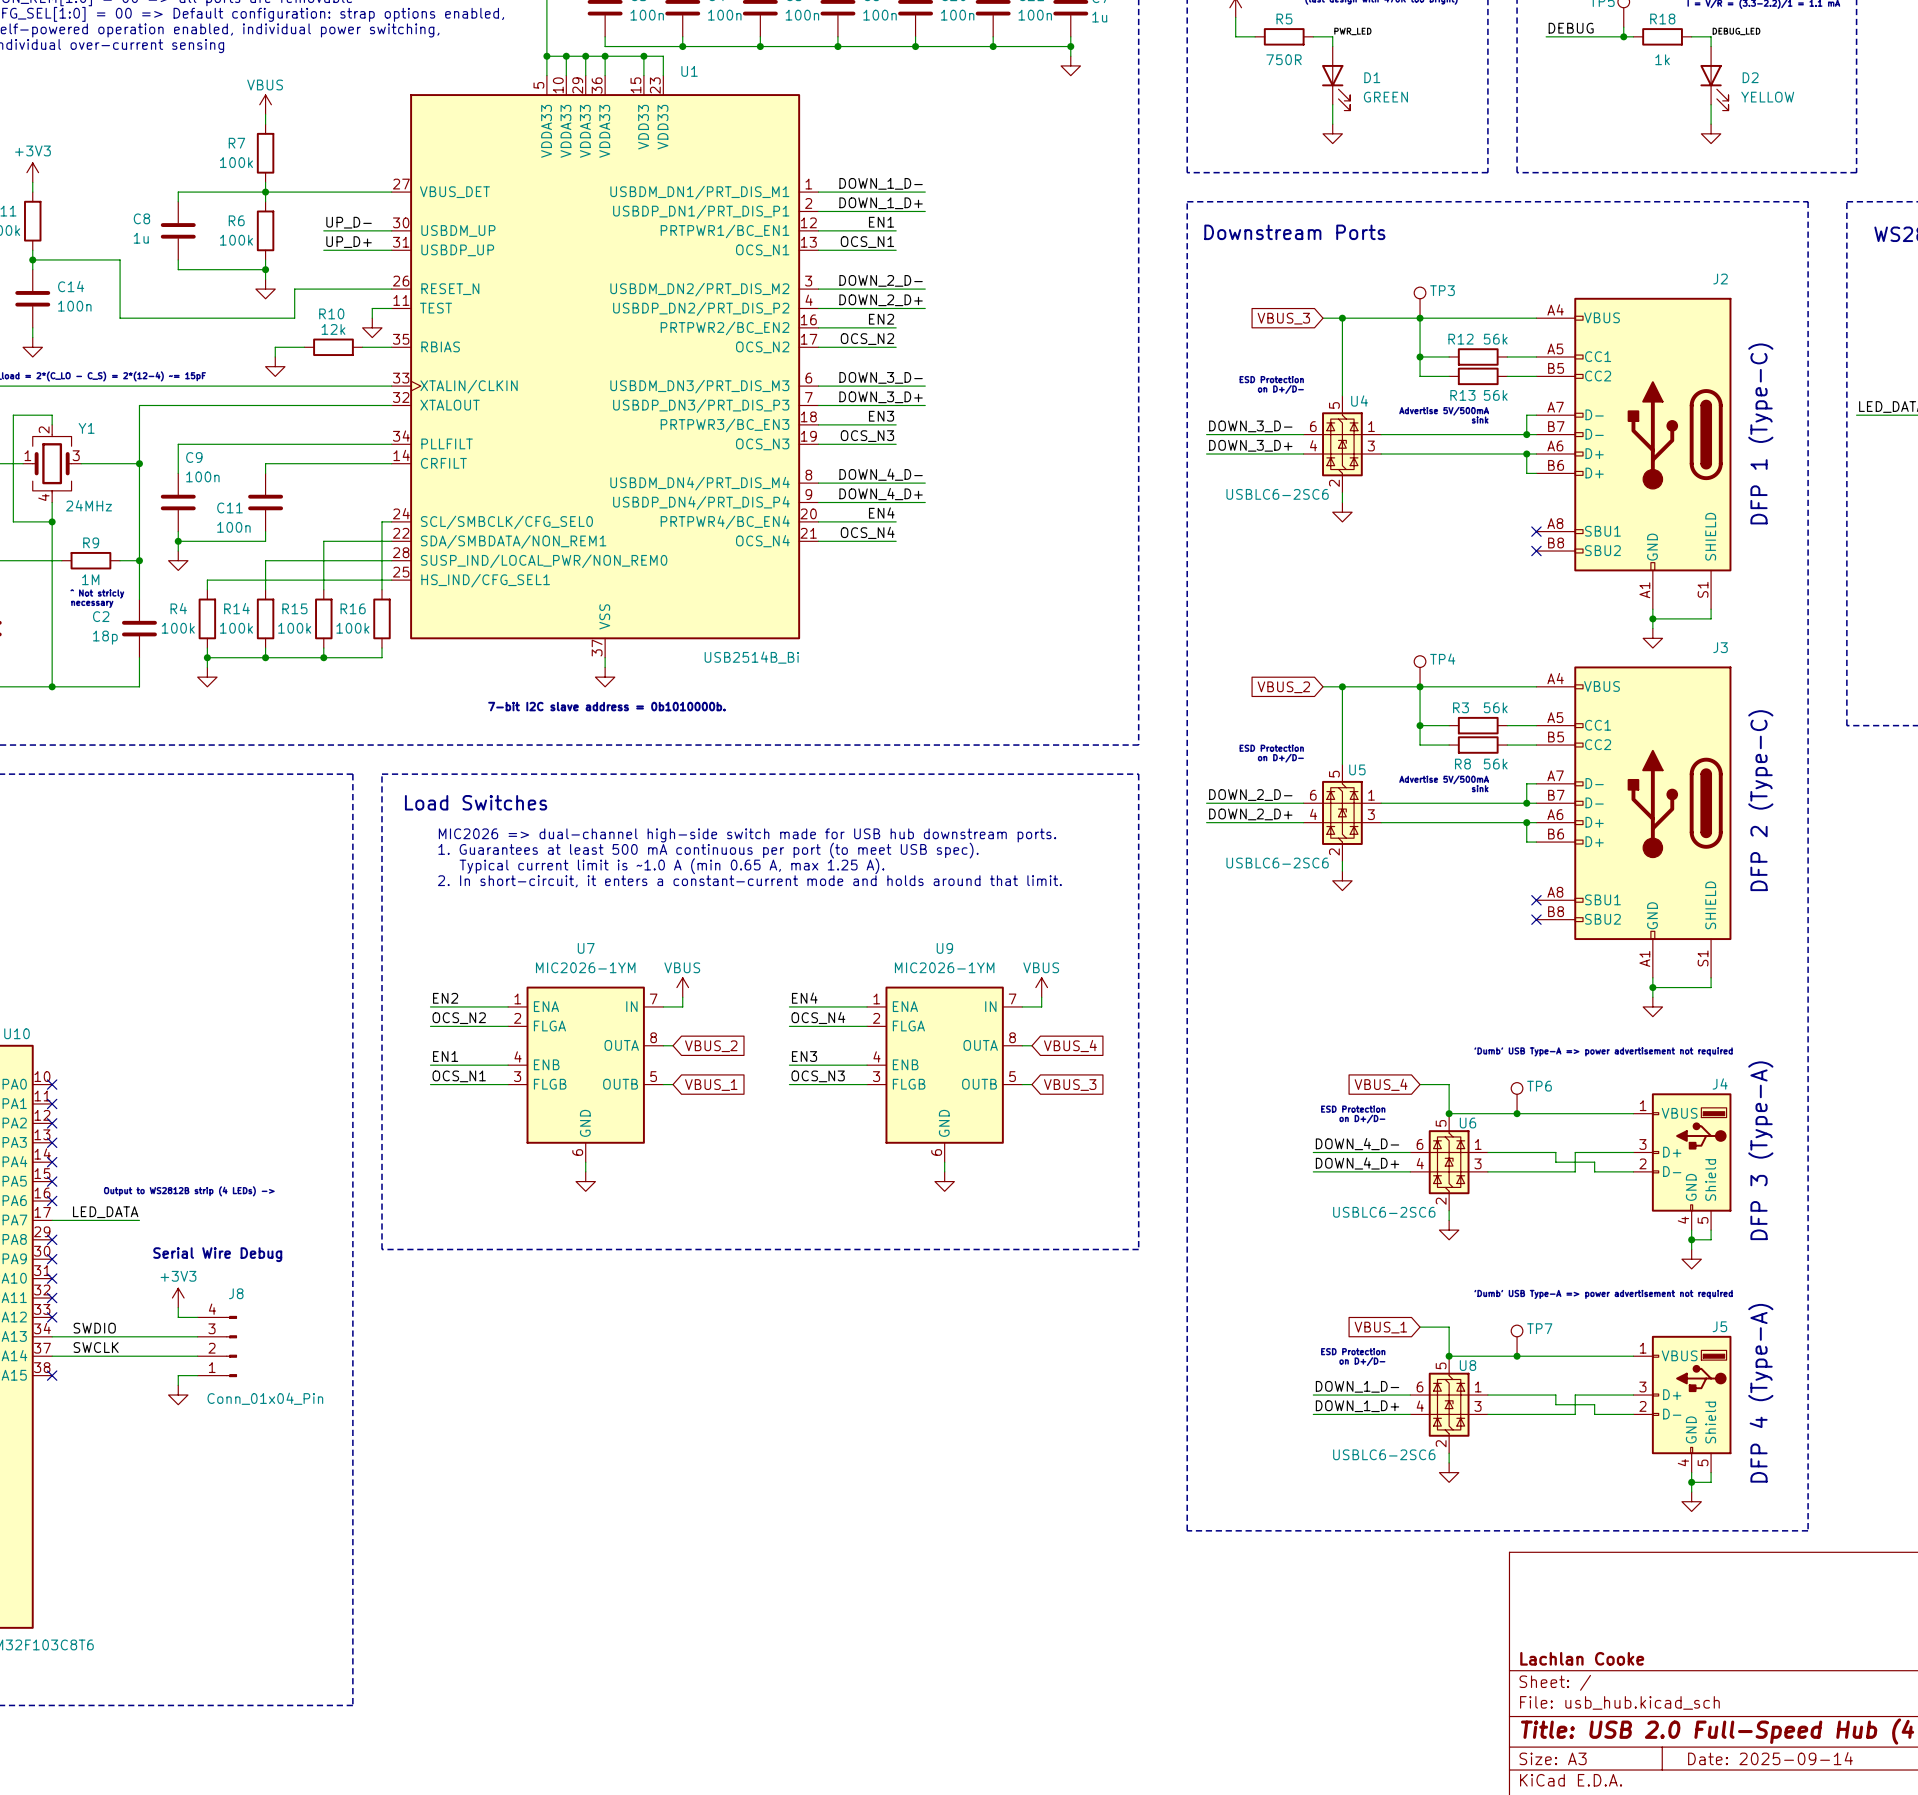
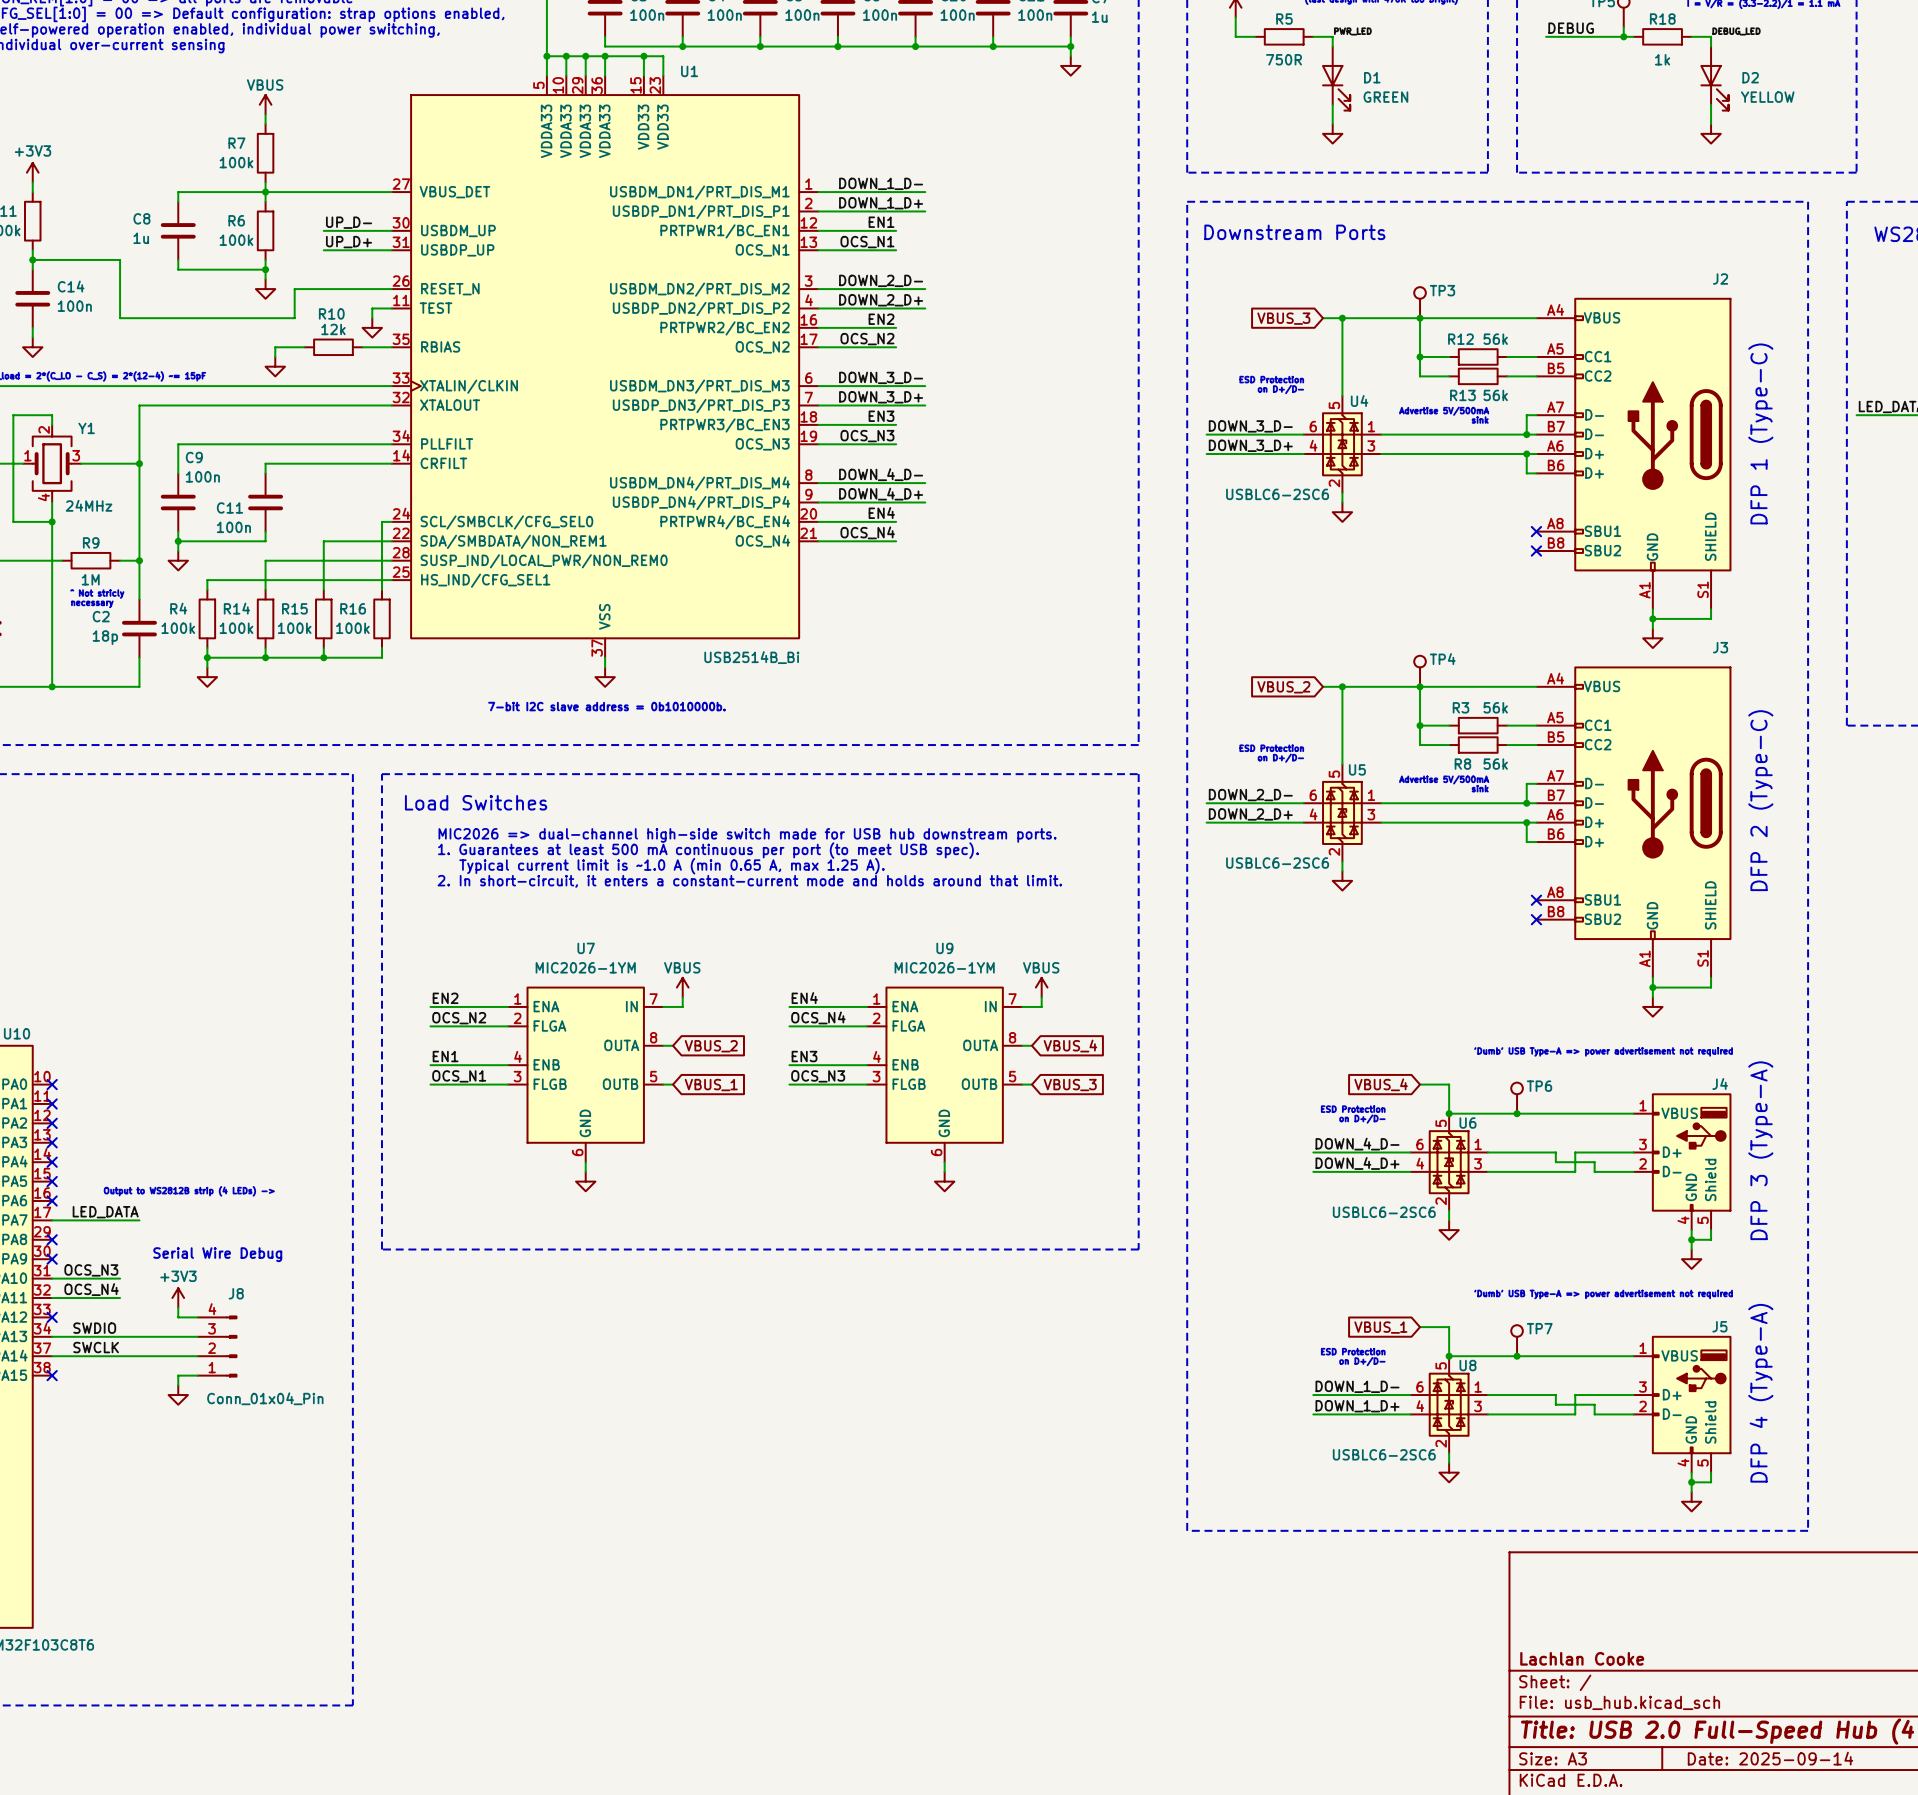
label: none -> OCS_N3 (91, 1270)
wire: none -> (52, 1278) (120, 1278)
no-connect mark: (52, 1278) -> none
label: none -> OCS_N4 (91, 1289)
wire: none -> (52, 1298) (120, 1298)
no-connect mark: (52, 1298) -> none

